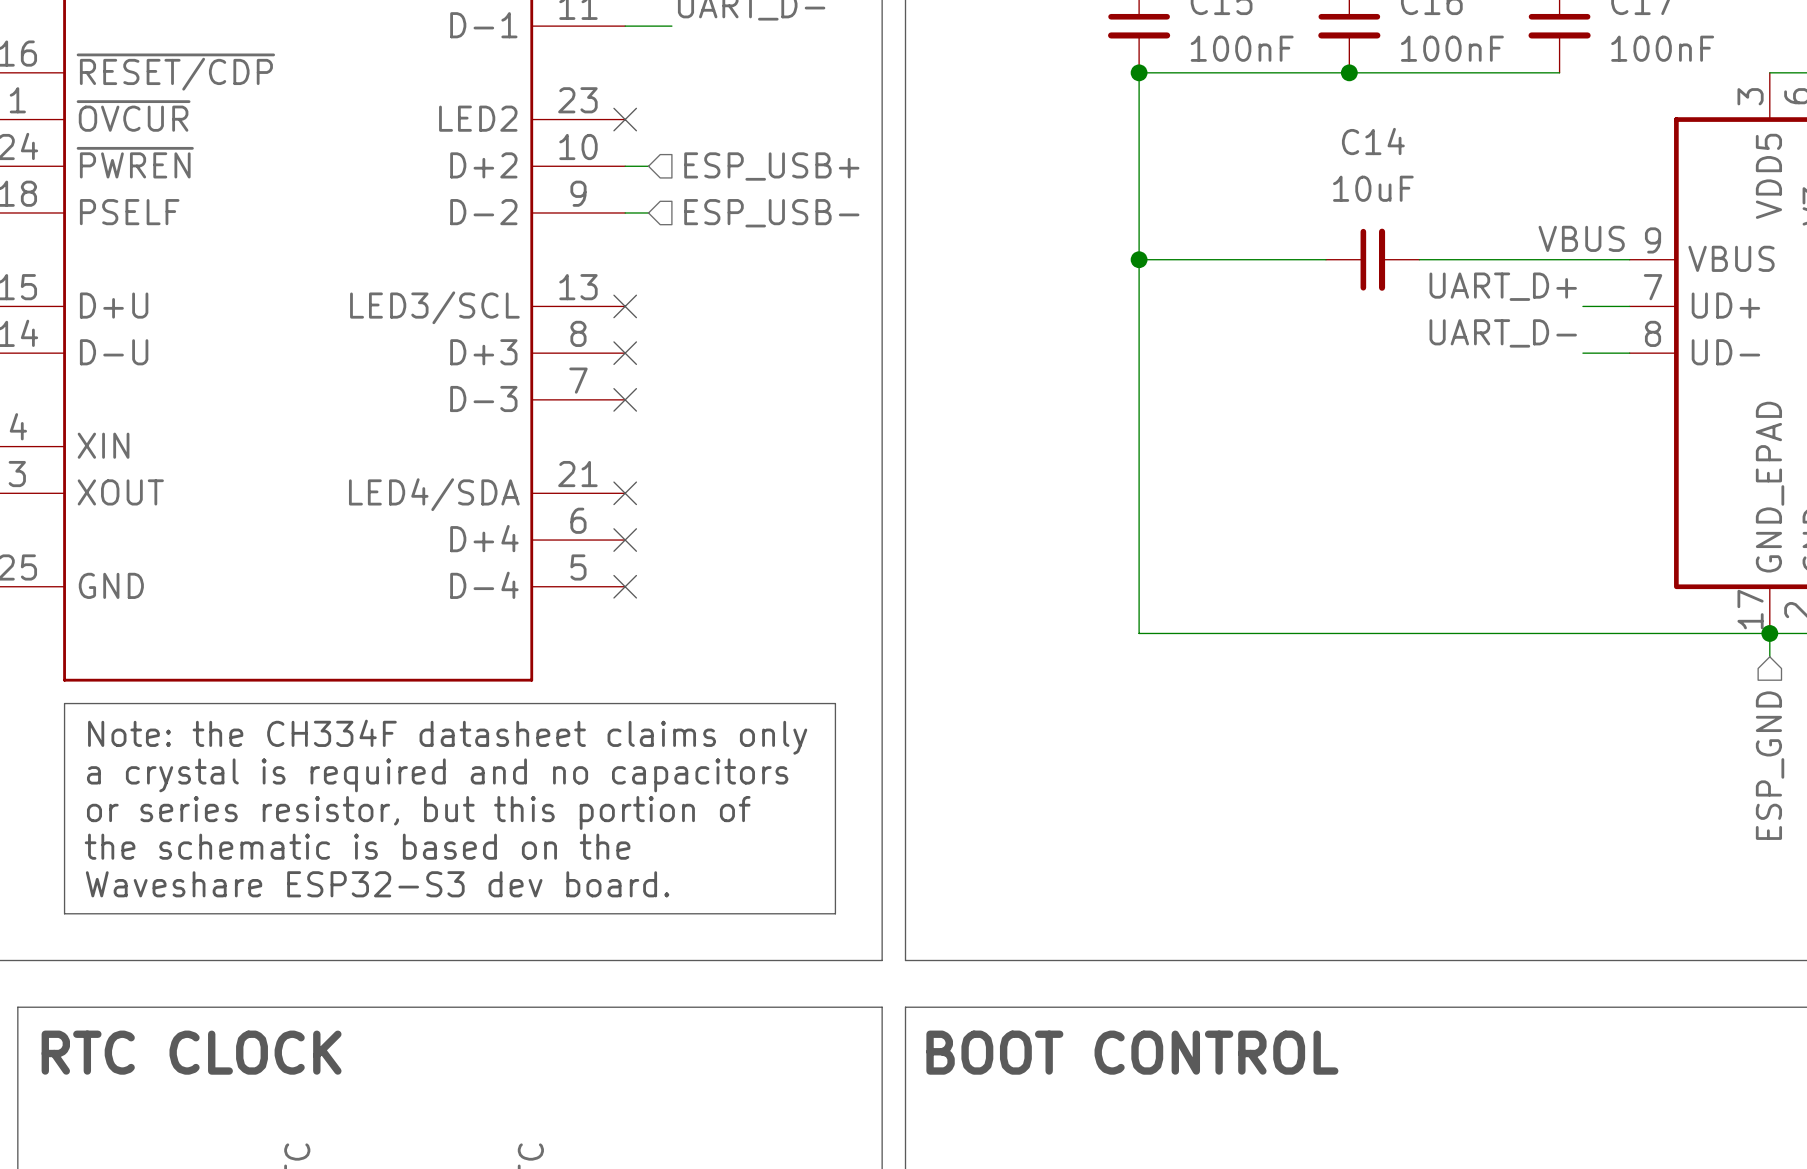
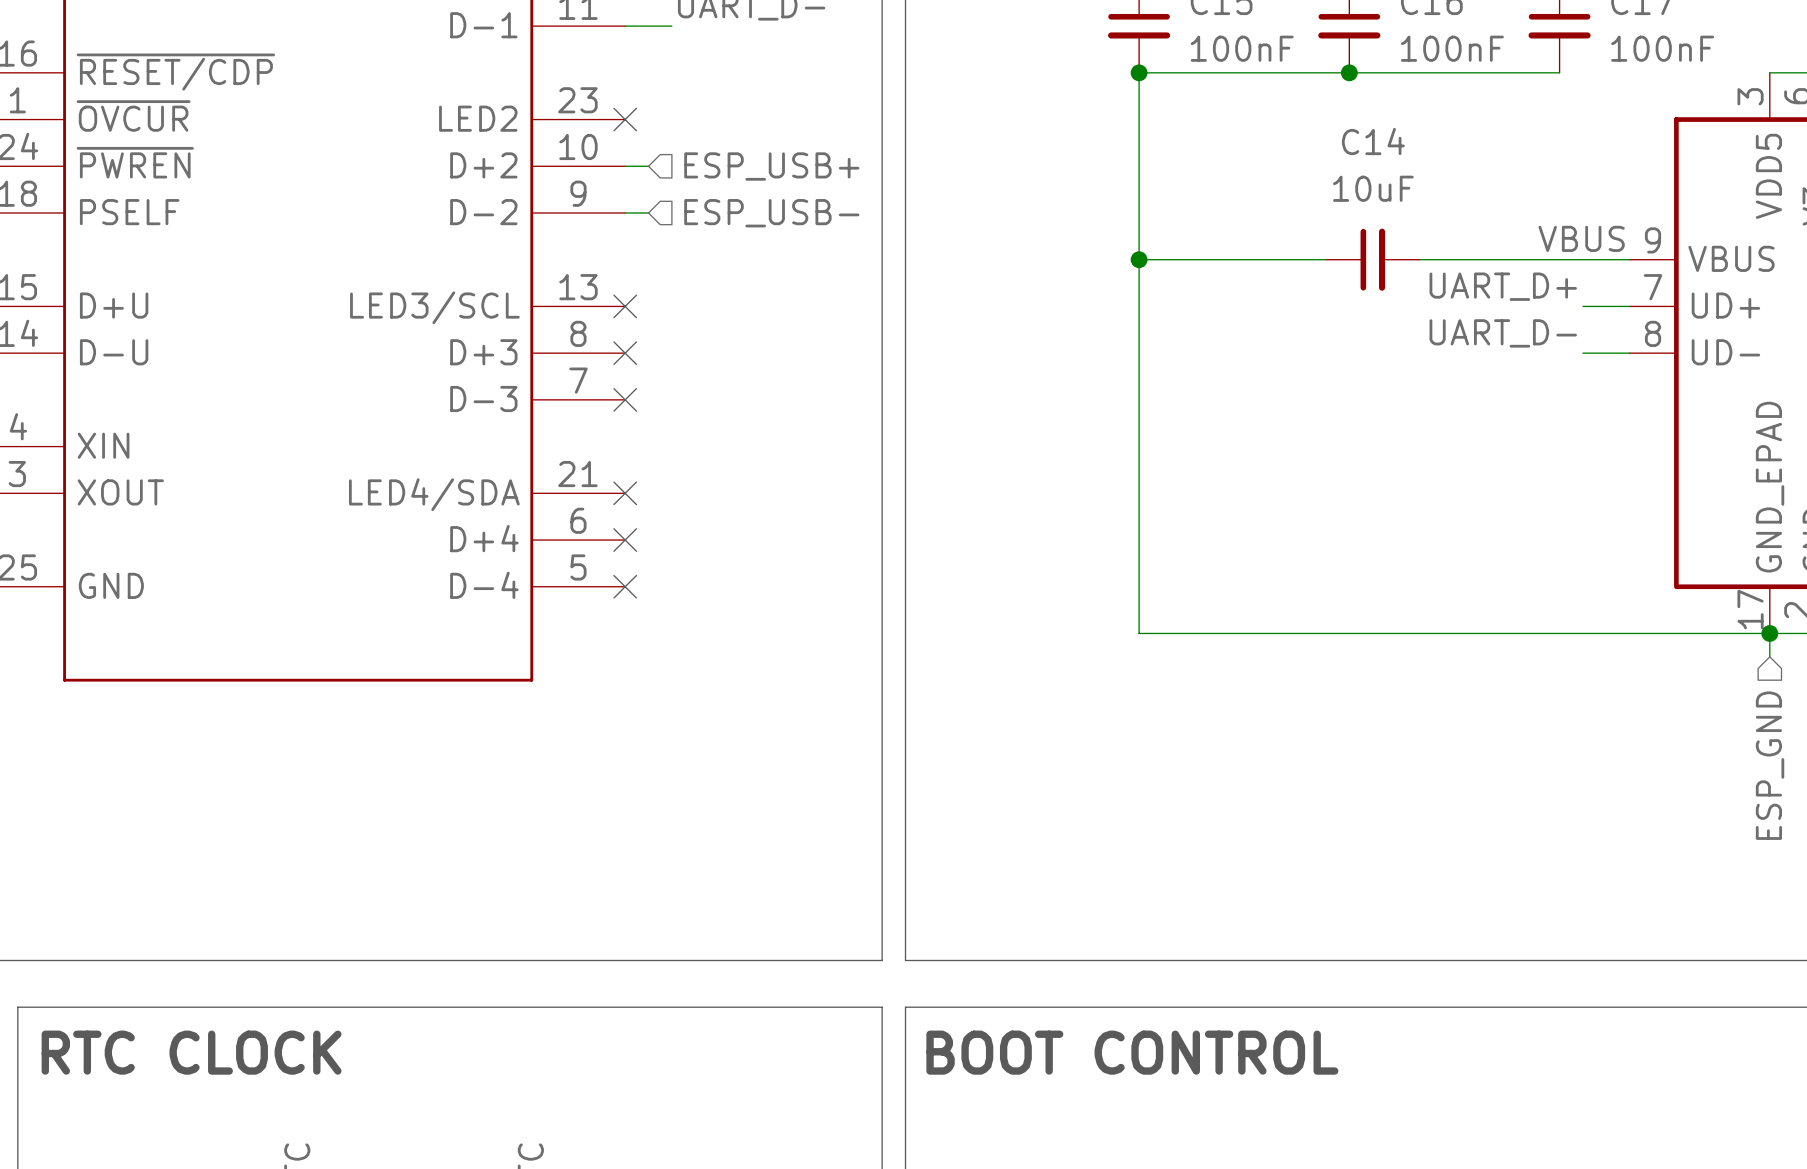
line: (64, 703) (835, 703) (835, 913) (64, 913) (64, 703) -> none
text: Note: the CH334F datasheet claims only (447, 737) -> none
text: a crystal is required and no capacitors (437, 775) -> none
text: or series resistor, but this portion of (418, 812) -> none
text: the schematic is based on the (357, 846) -> none
text: Waveshare ESP32-S3 dev board. (377, 884) -> none

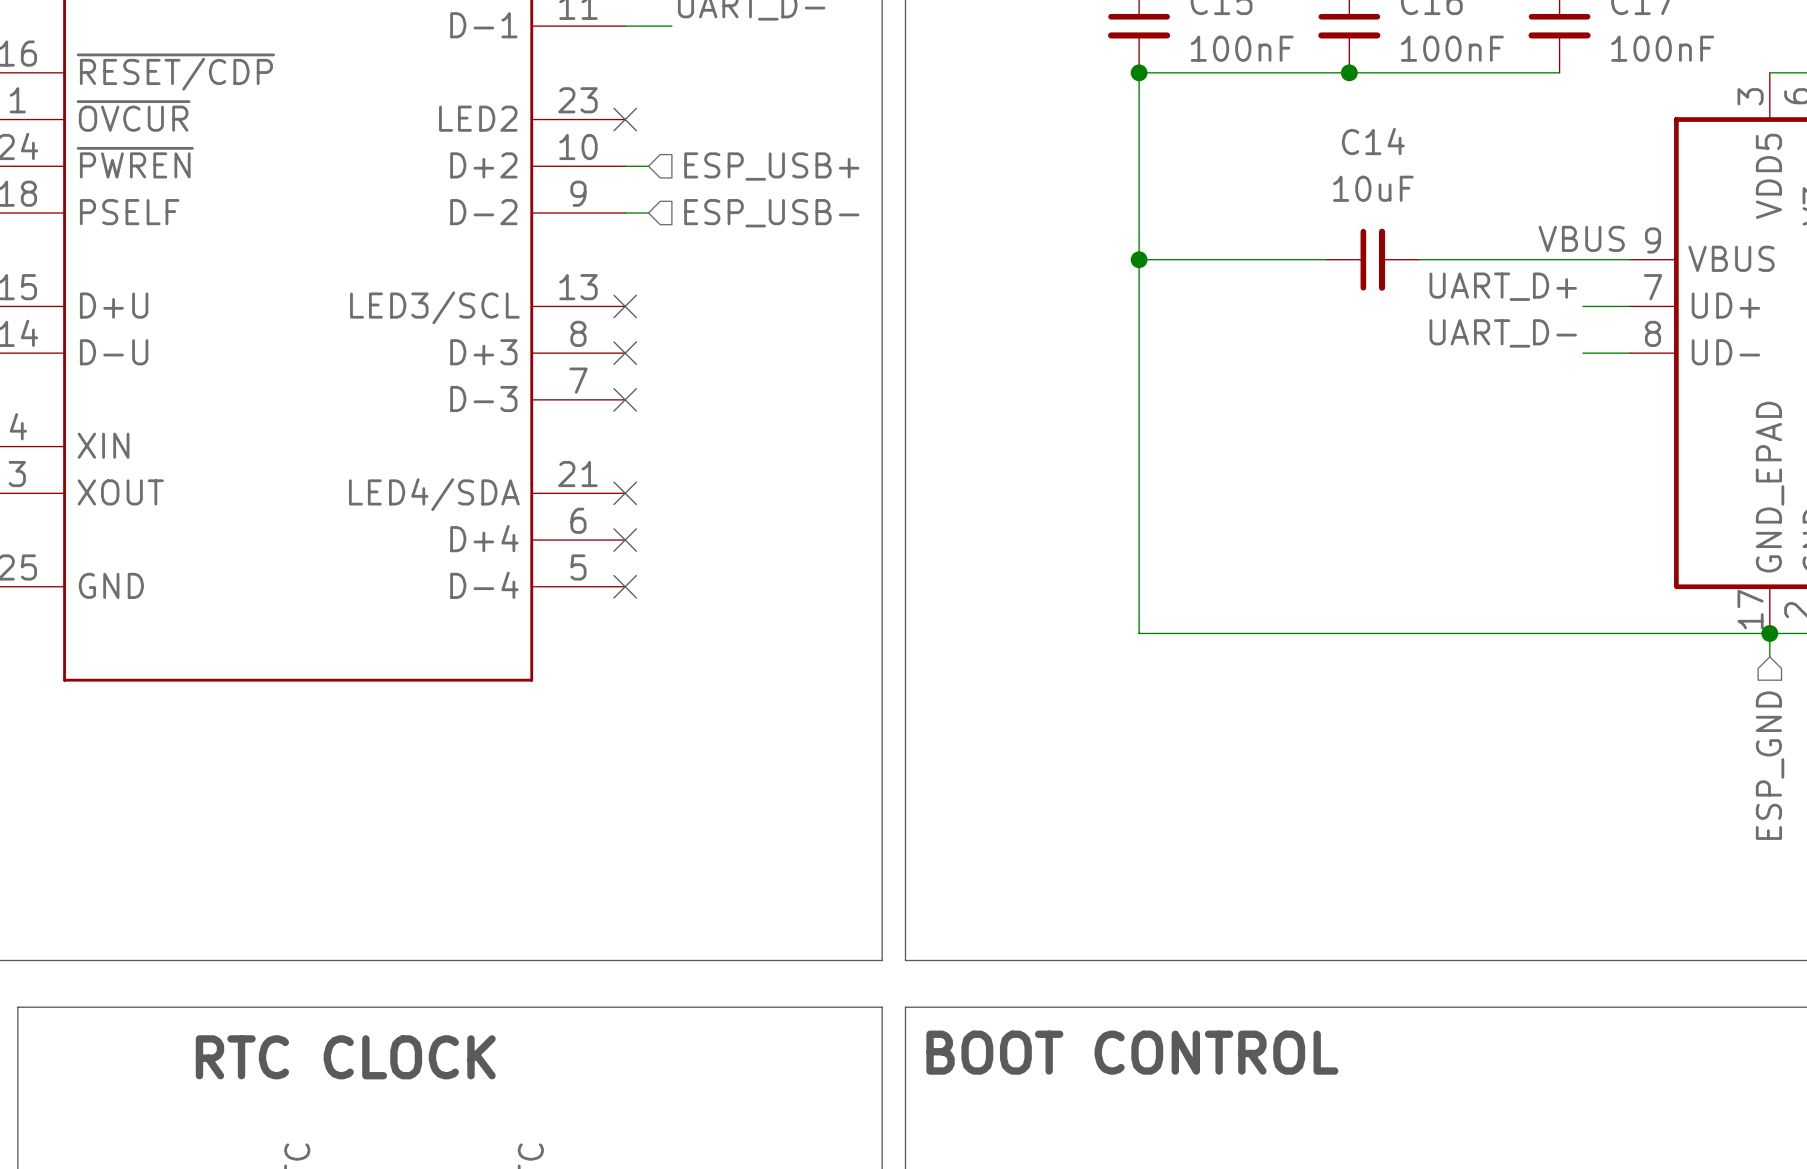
text position: RTC CLOCK (191, 1052) -> RTC CLOCK (345, 1057)

